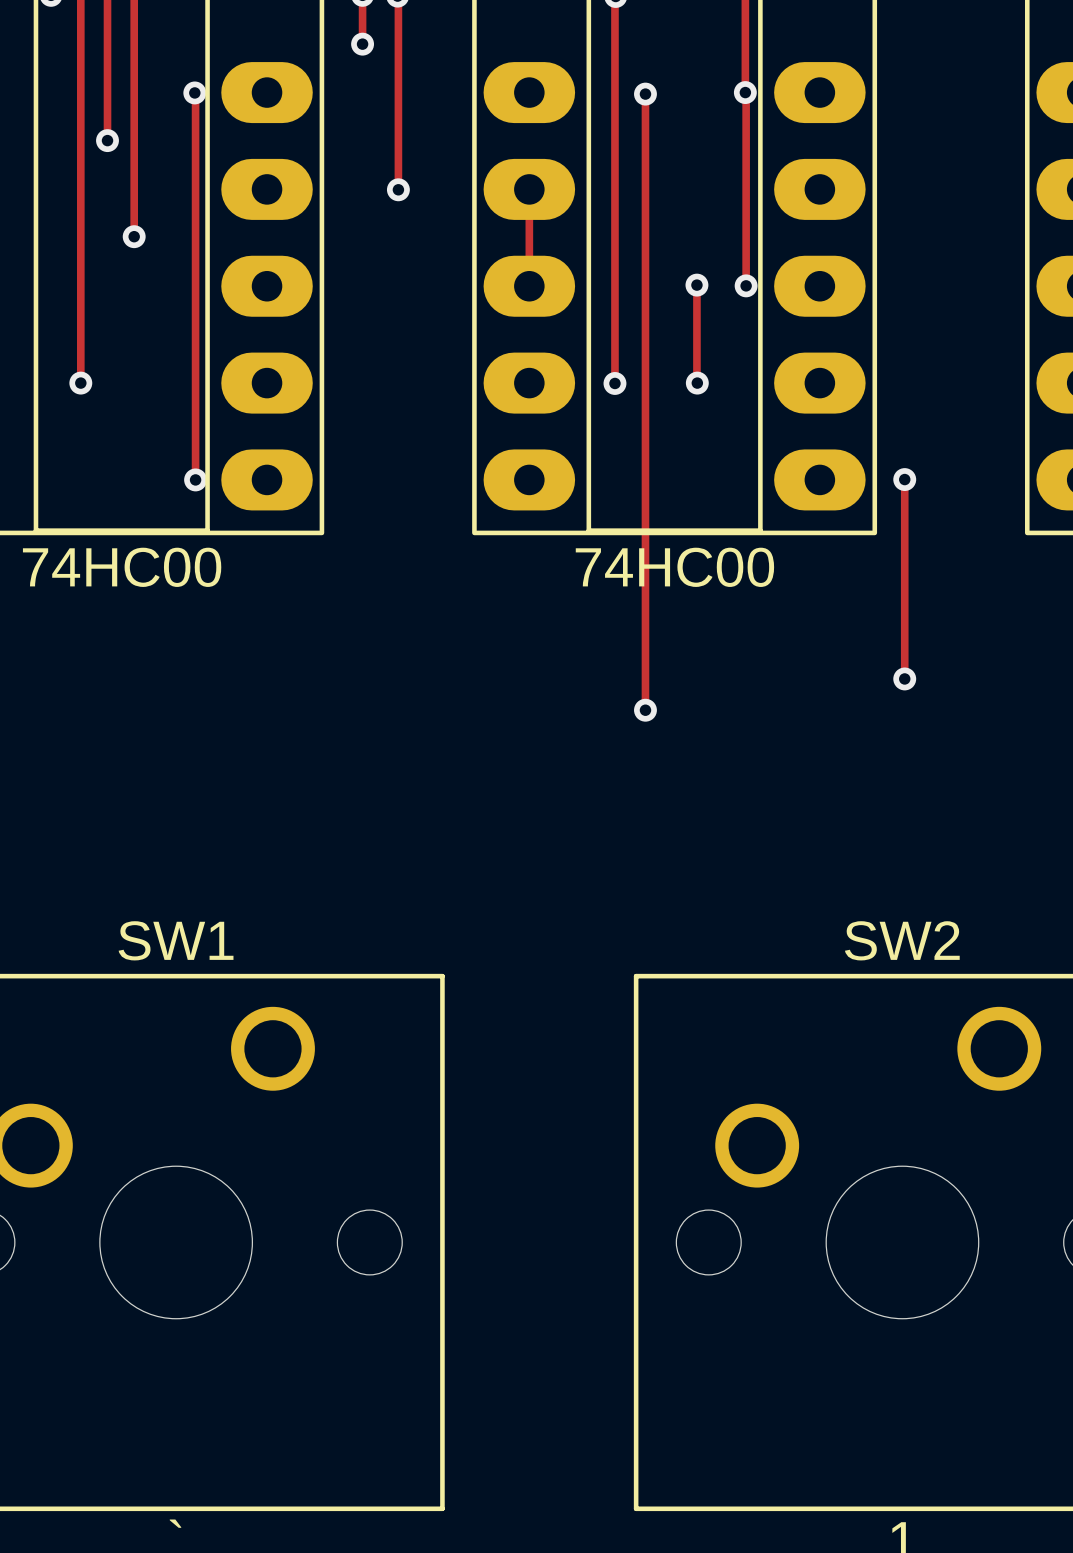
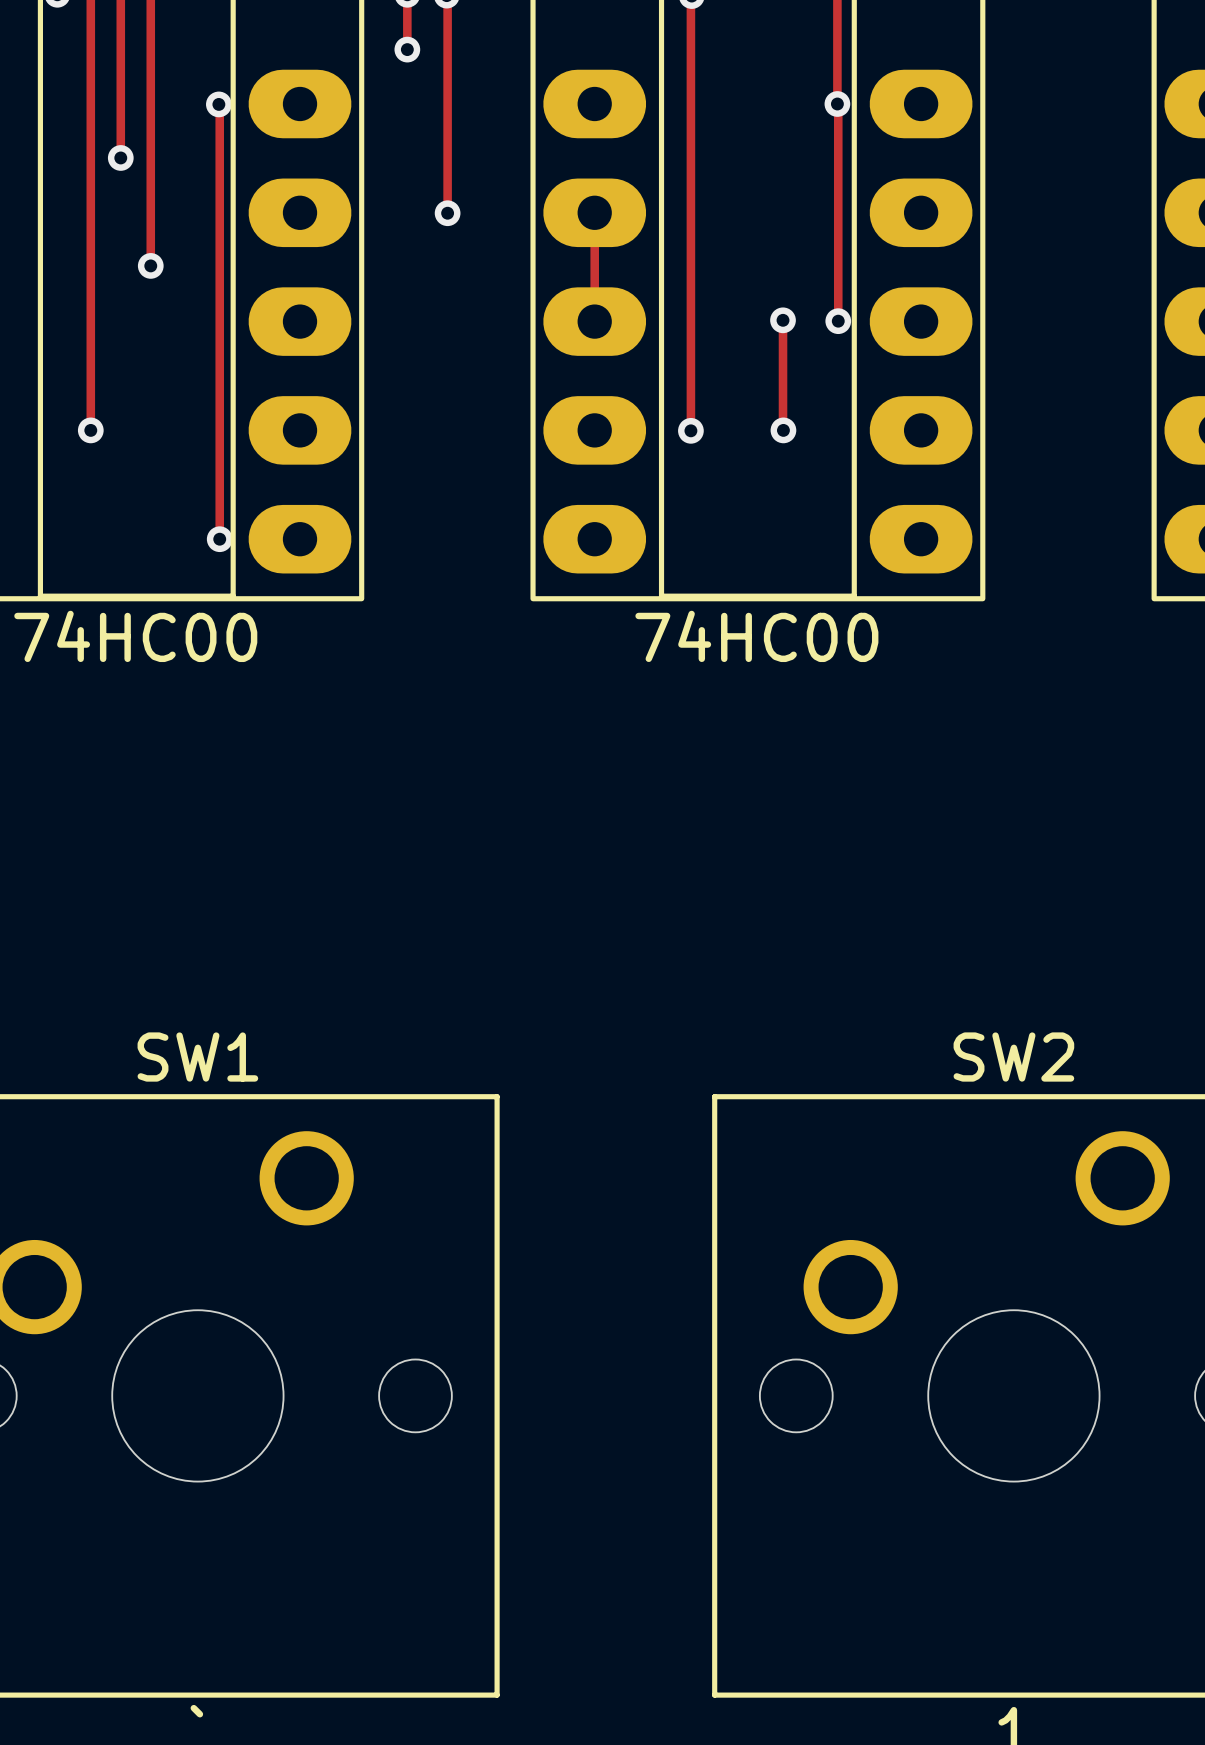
track: (645, 94) (645, 710) -> none
via: (645, 94) -> none
track: (904, 479) (904, 678) -> none
via: (904, 479) -> none
via: (904, 678) -> none
via: (645, 710) -> none

